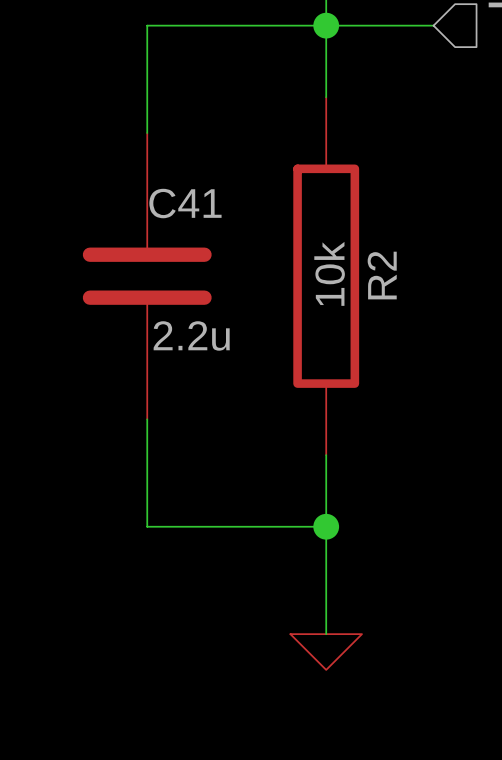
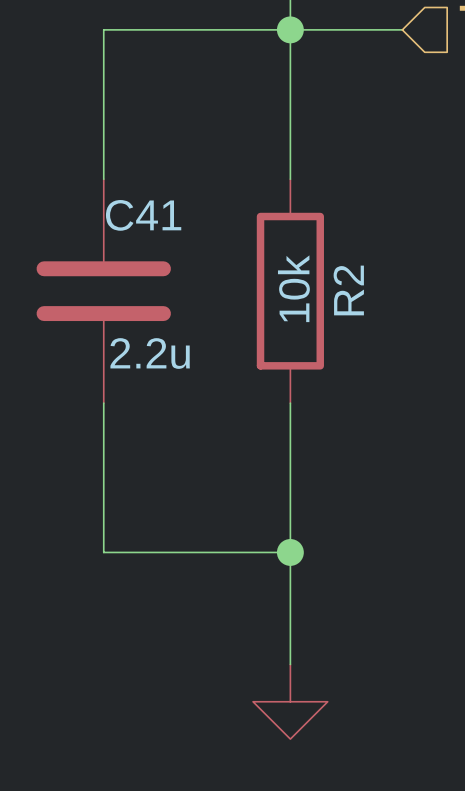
R2 symbol: [293, 97, 360, 456] -> [256, 179, 324, 404]
C41 symbol: [82, 133, 212, 420] -> [36, 179, 171, 404]
power symbol shape: [290, 634, 363, 670] -> [253, 664, 328, 740]

